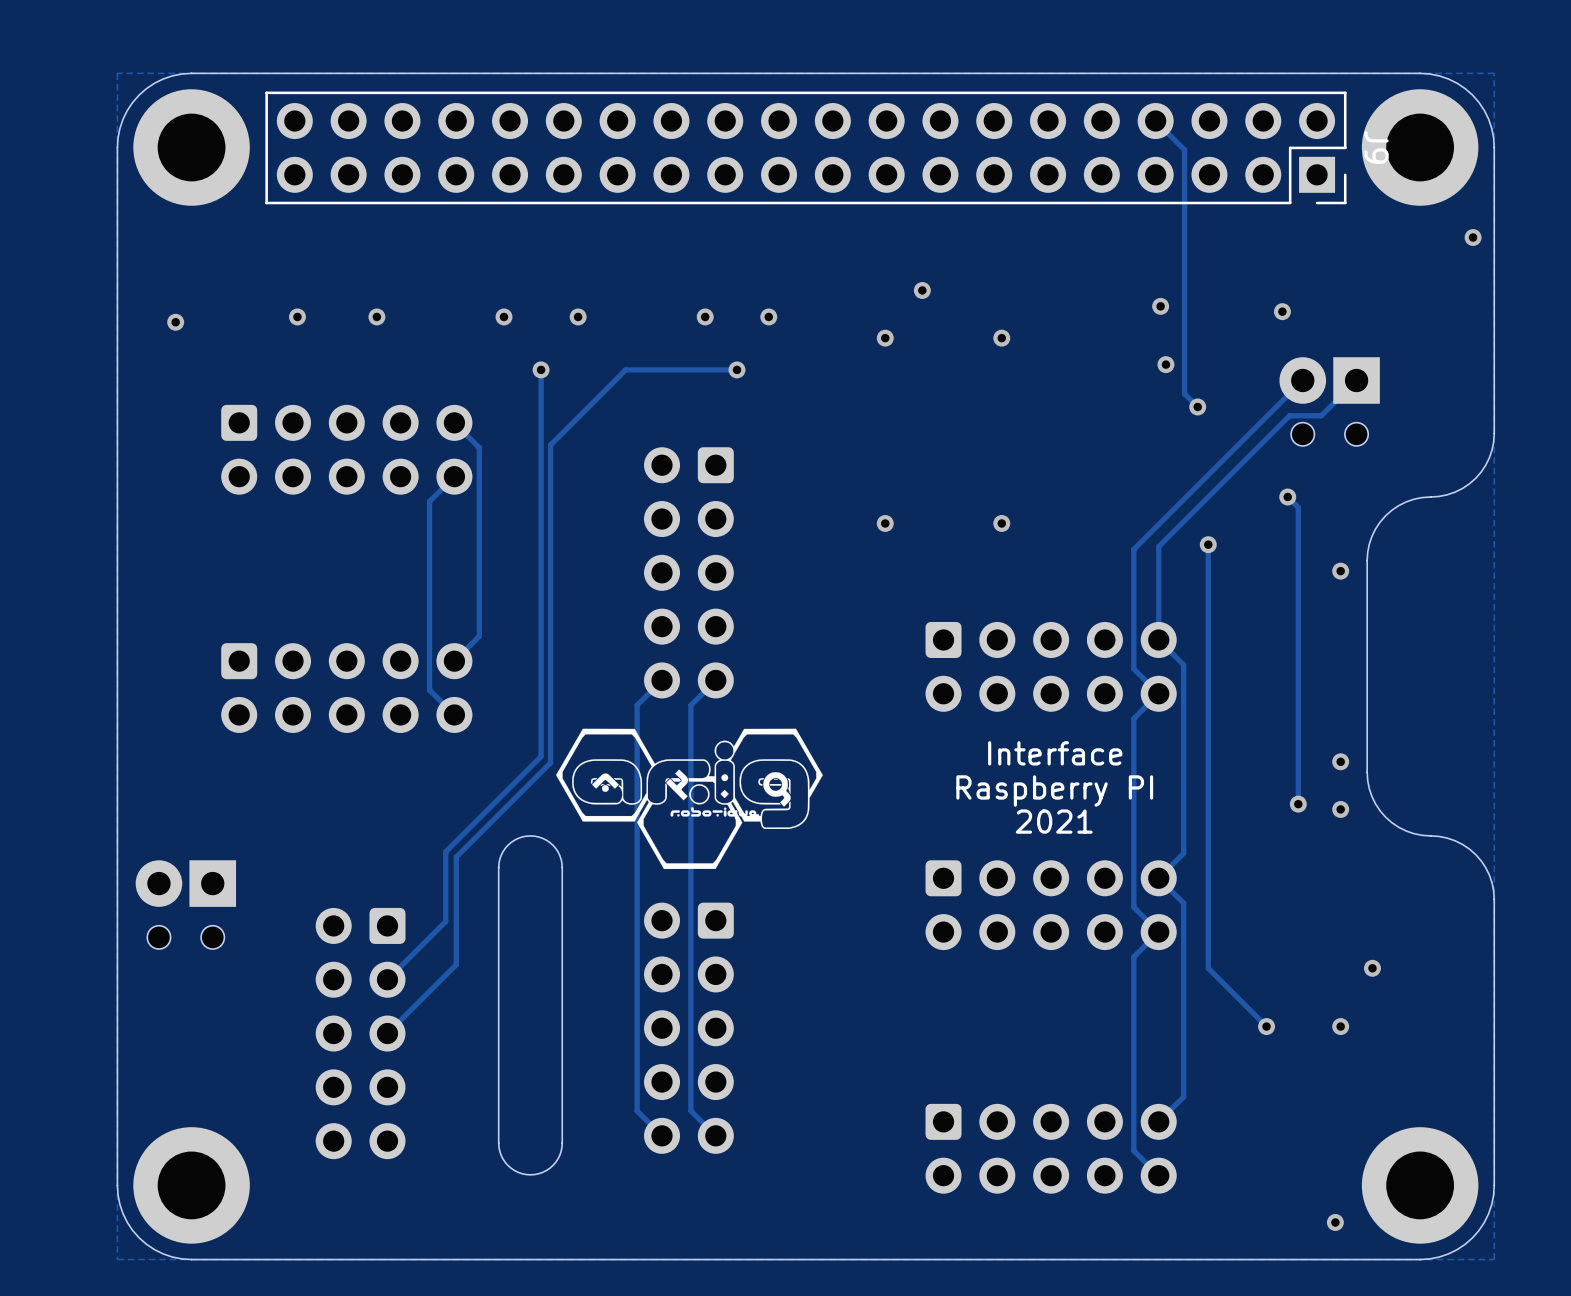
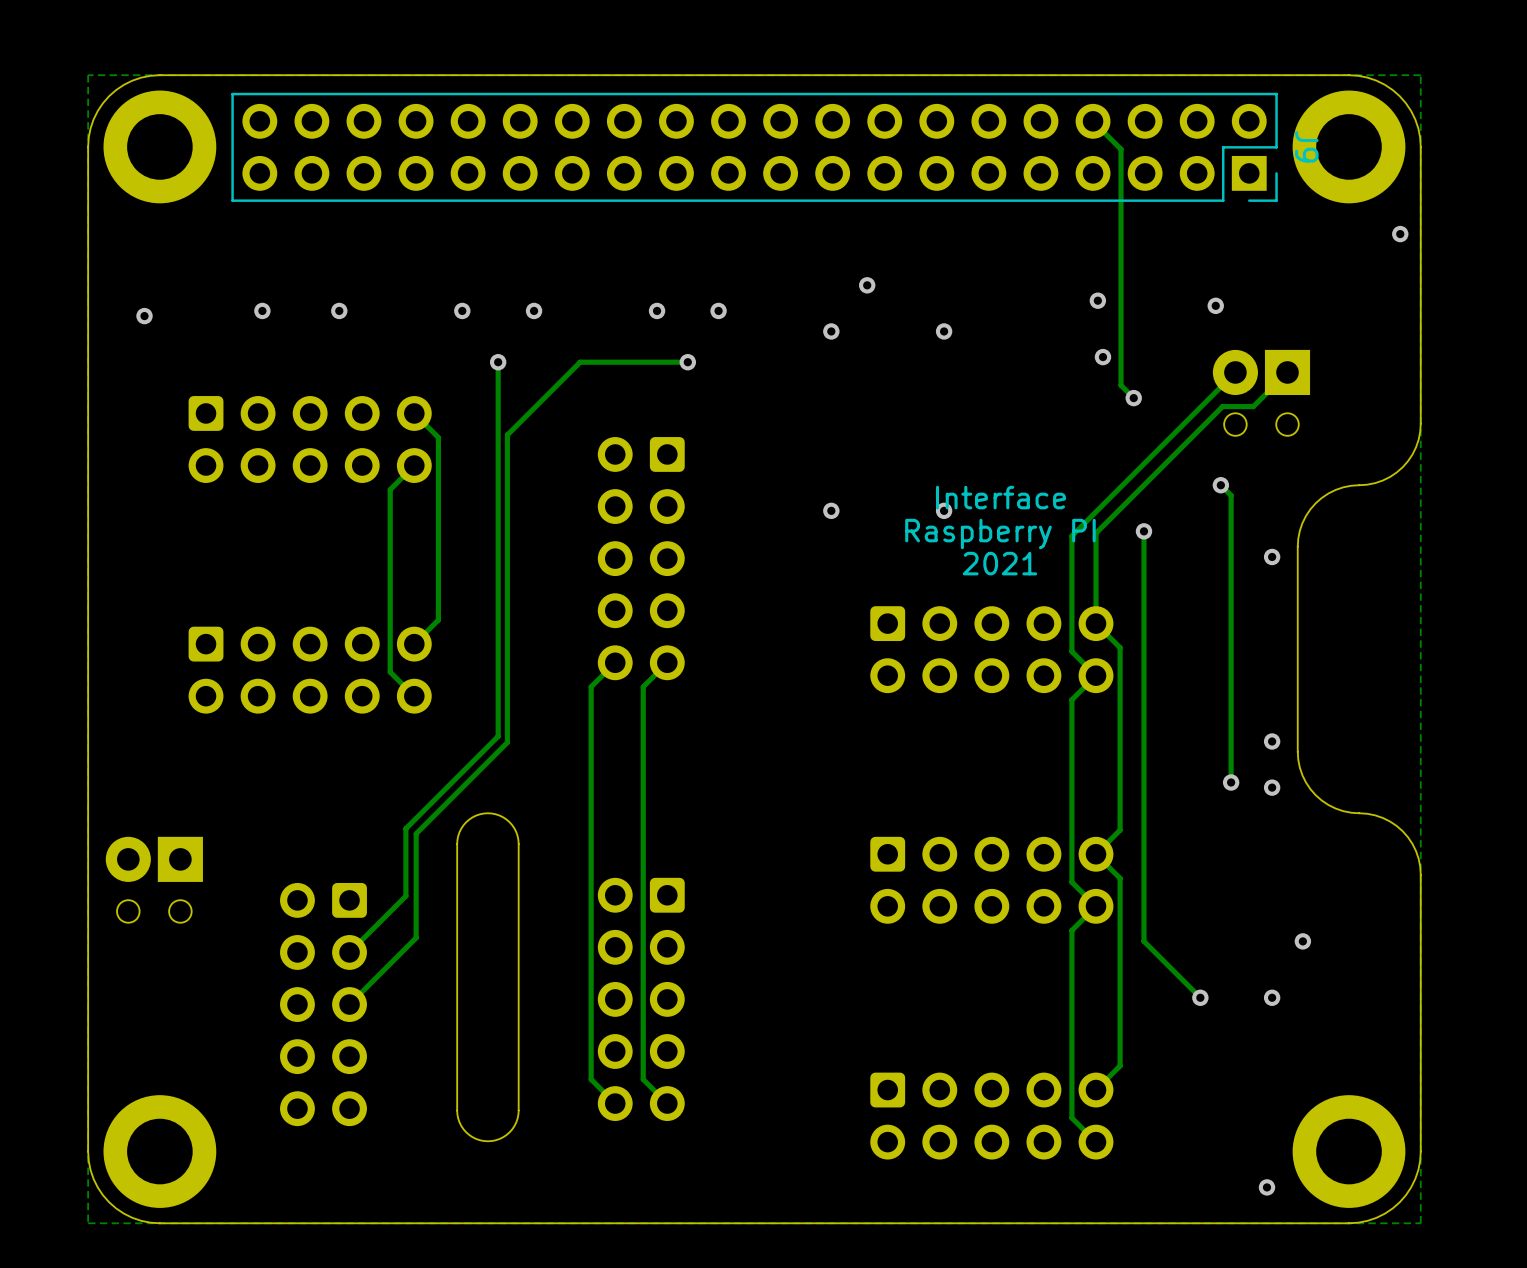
drawing: [556, 728, 823, 870] -> none
text position: Interface (1055, 753) -> Interface (1000, 497)
text position: Raspberry PI (1054, 790) -> Raspberry PI (1000, 534)
text position: 2021 (1054, 821) -> 2021 (999, 563)

